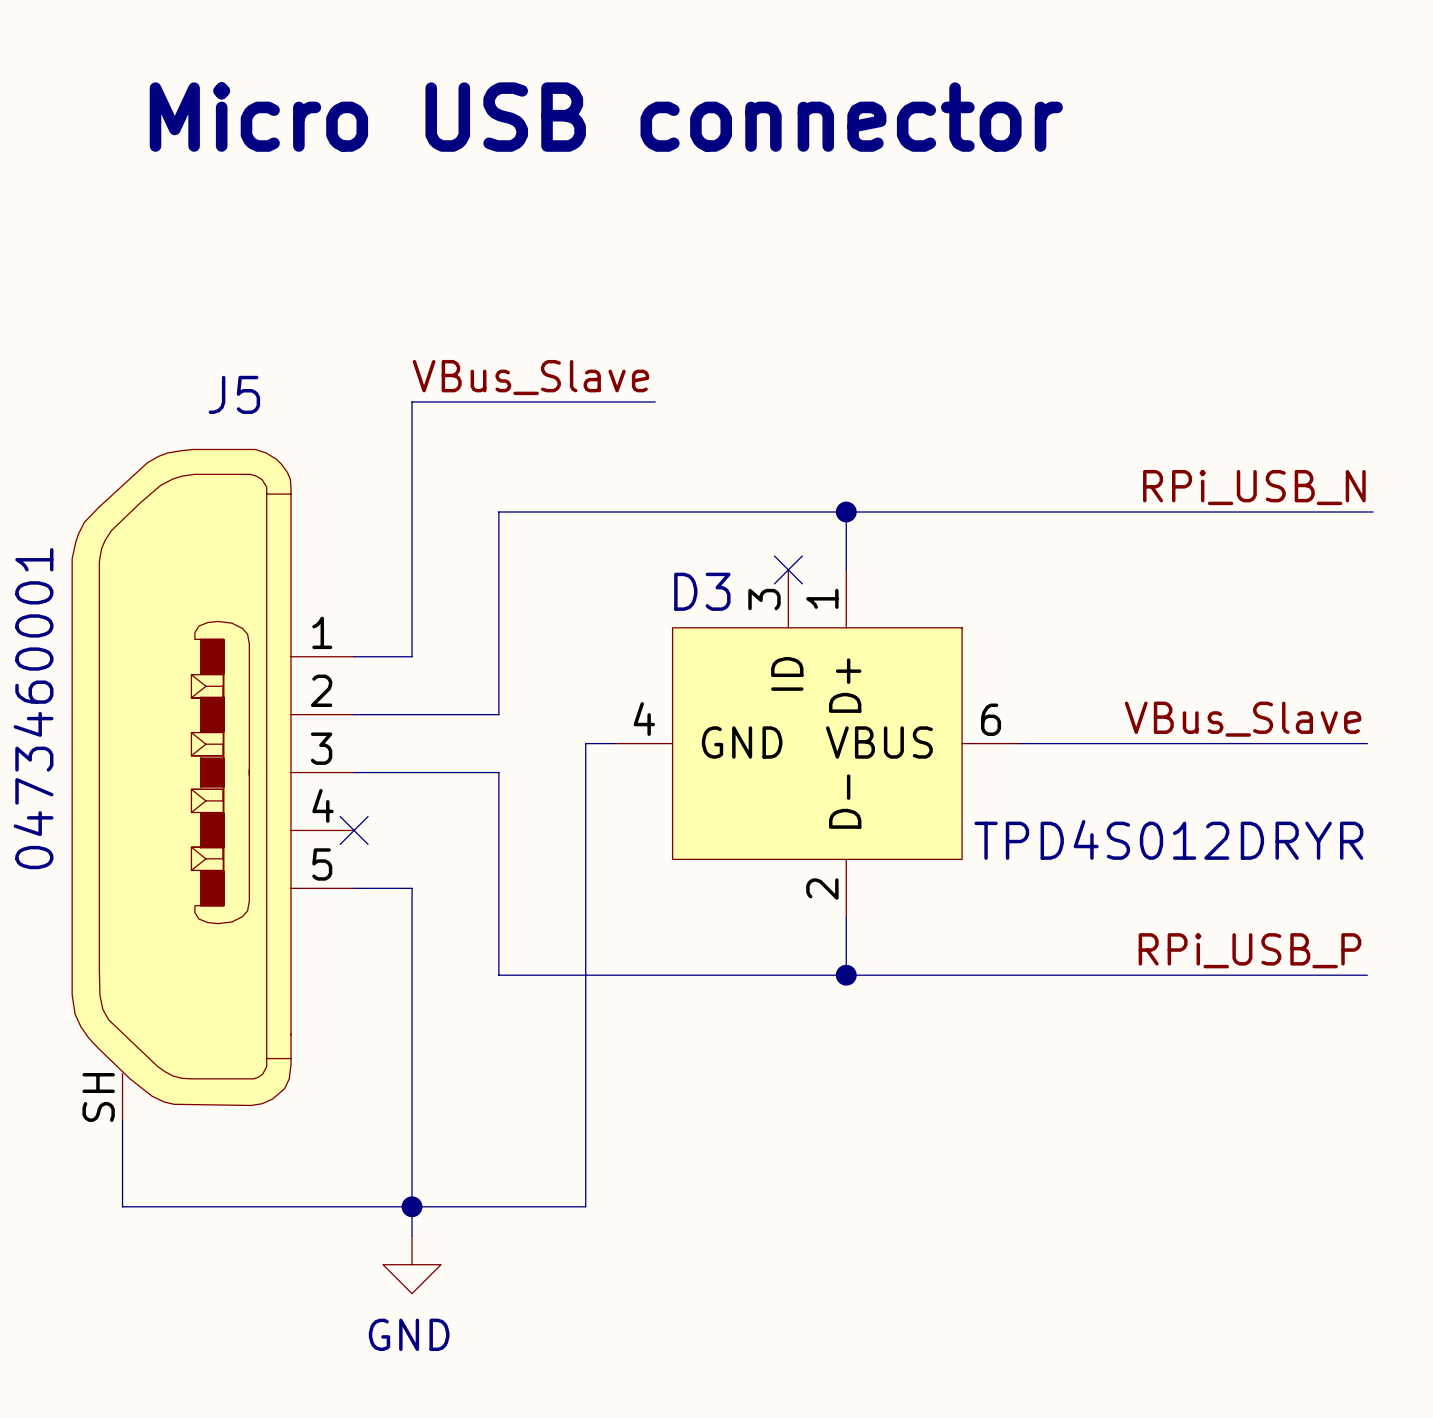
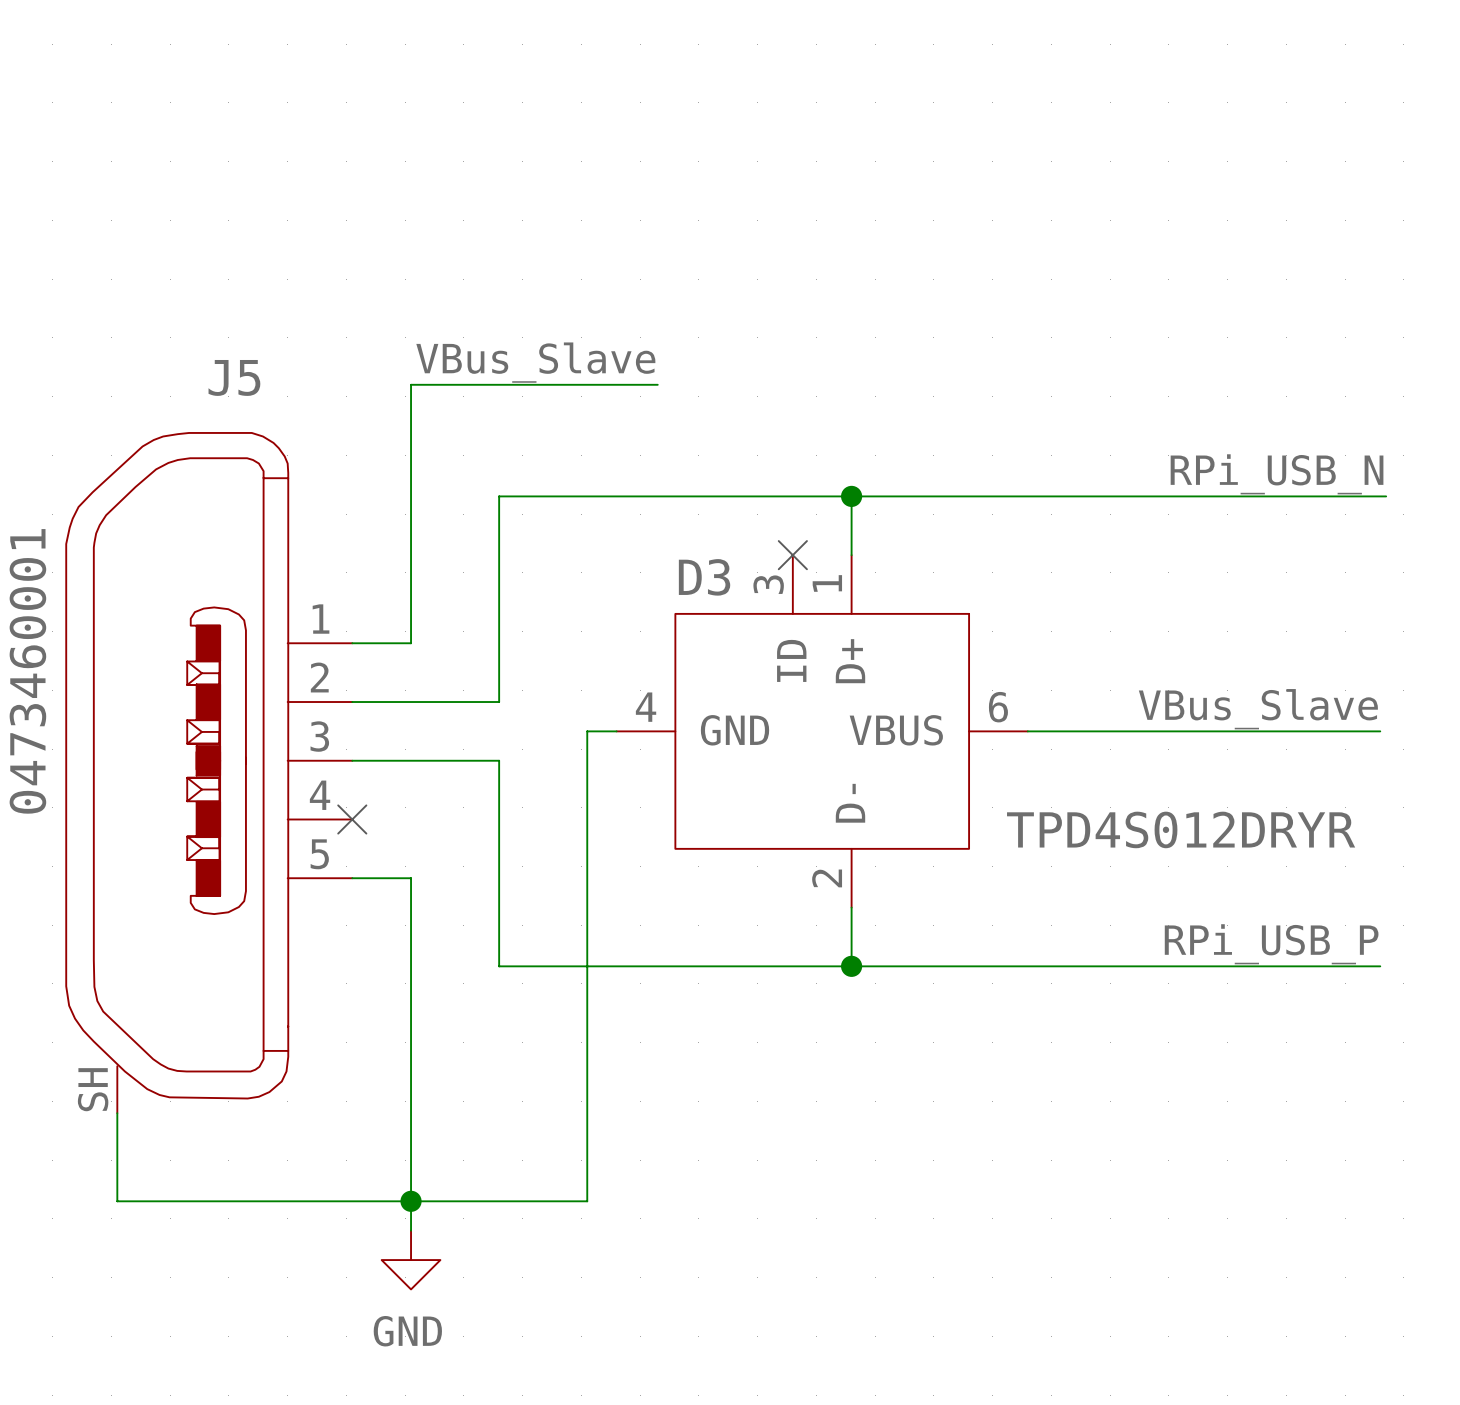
text: Micro USB connector (606, 117) -> none

